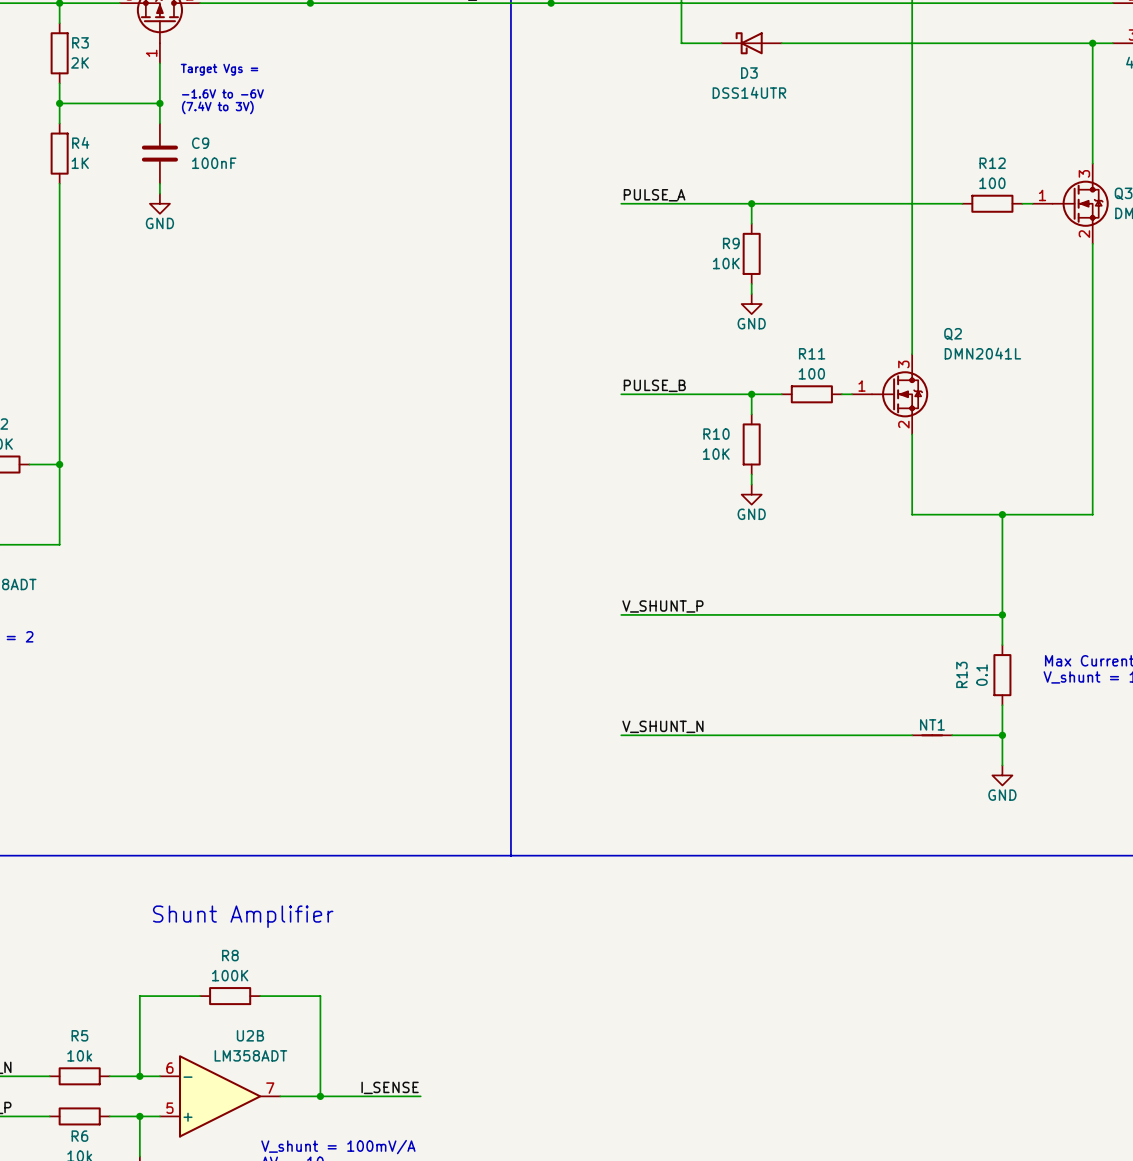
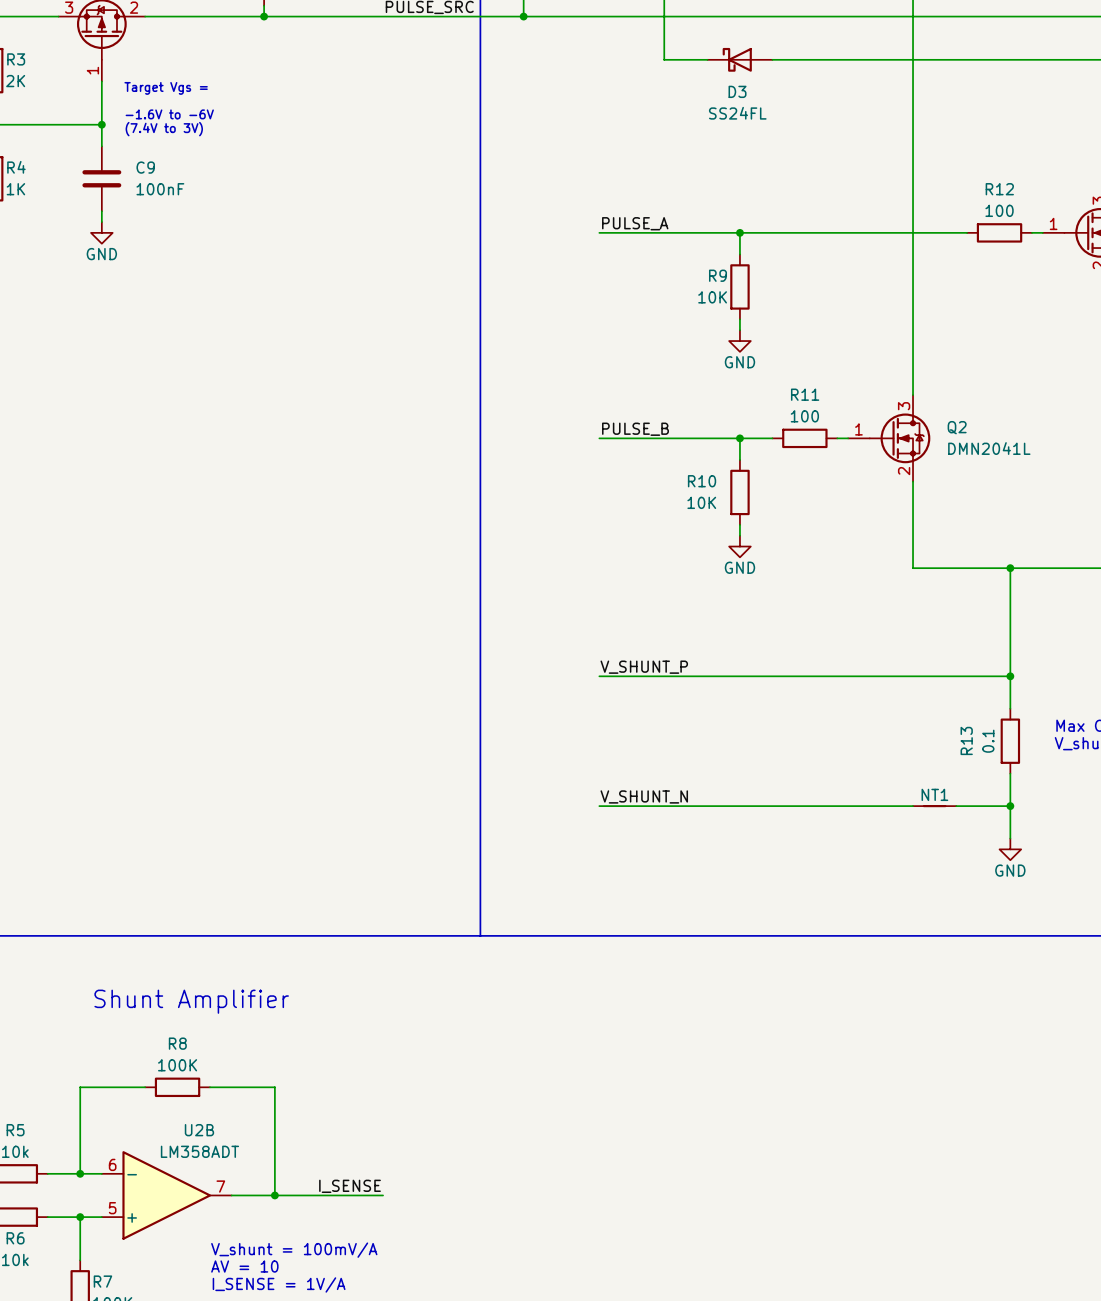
D3 value: DSS14UTR (749, 92) -> SS24FL (737, 113)
Q2 name position: Q2 (953, 334) -> Q2 (957, 427)
Q2 value position: DMN2041L (982, 353) -> DMN2041L (989, 448)

